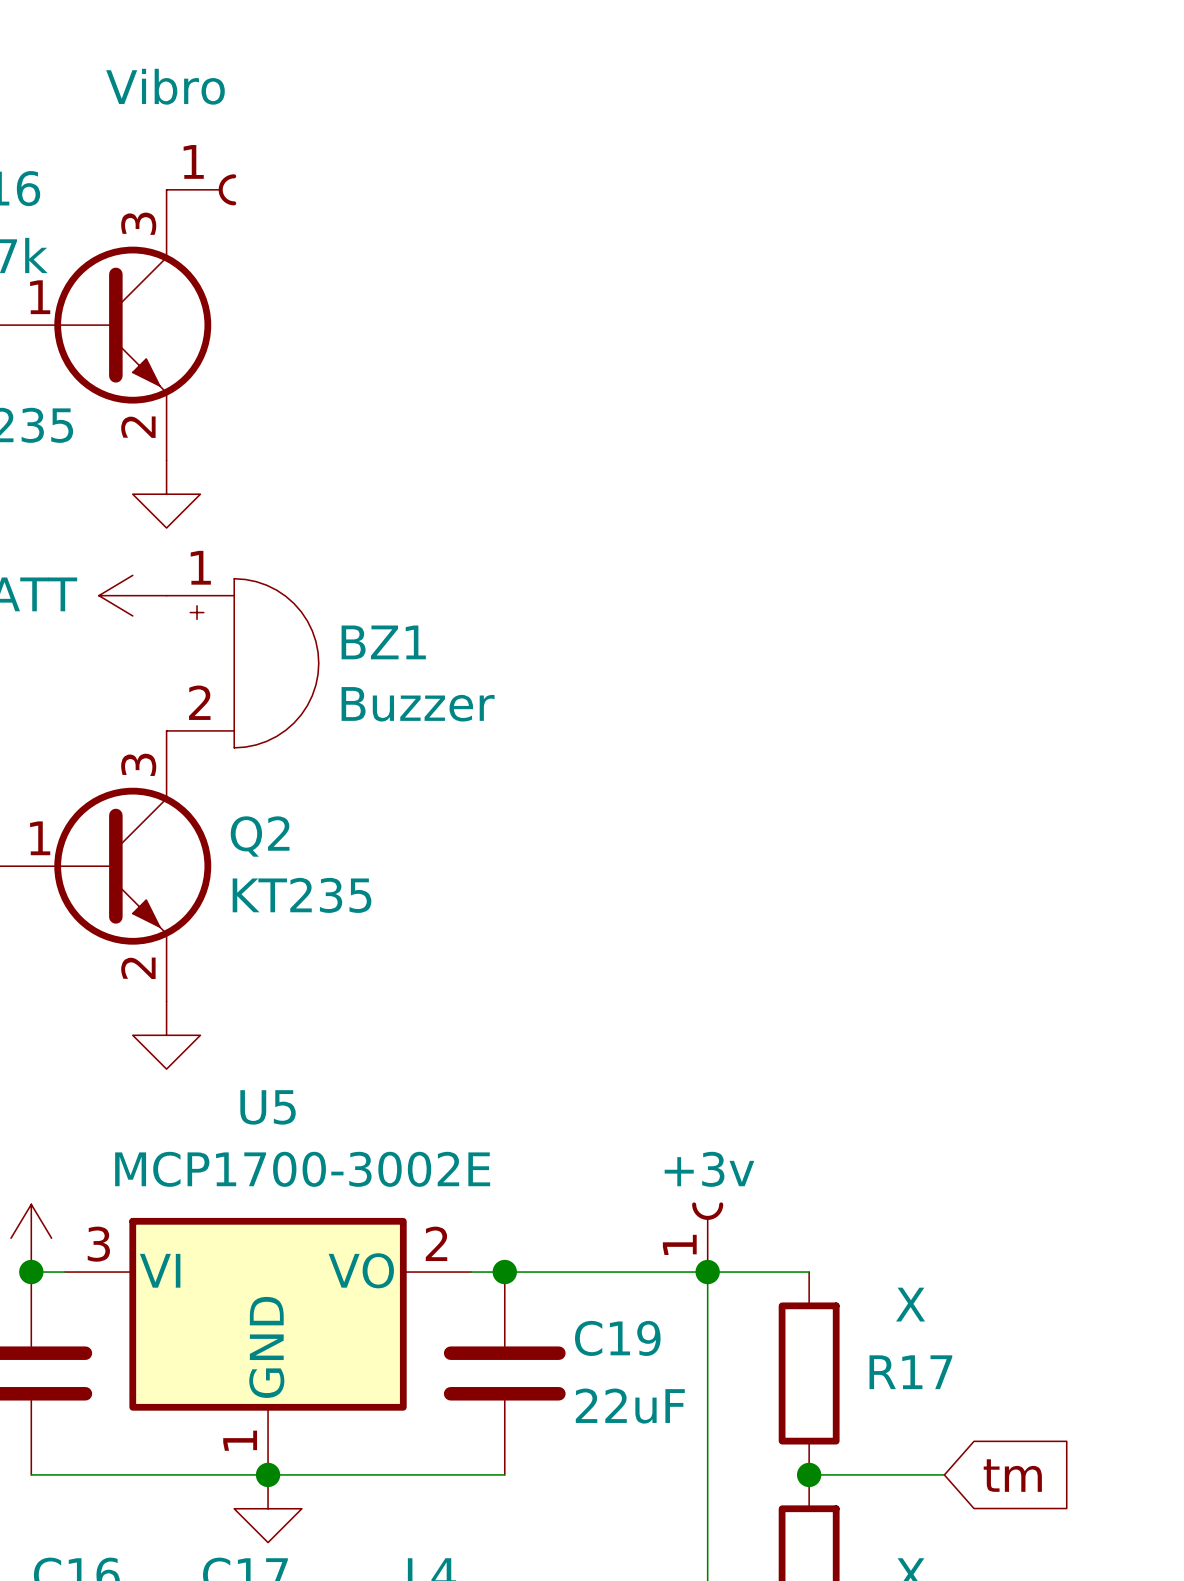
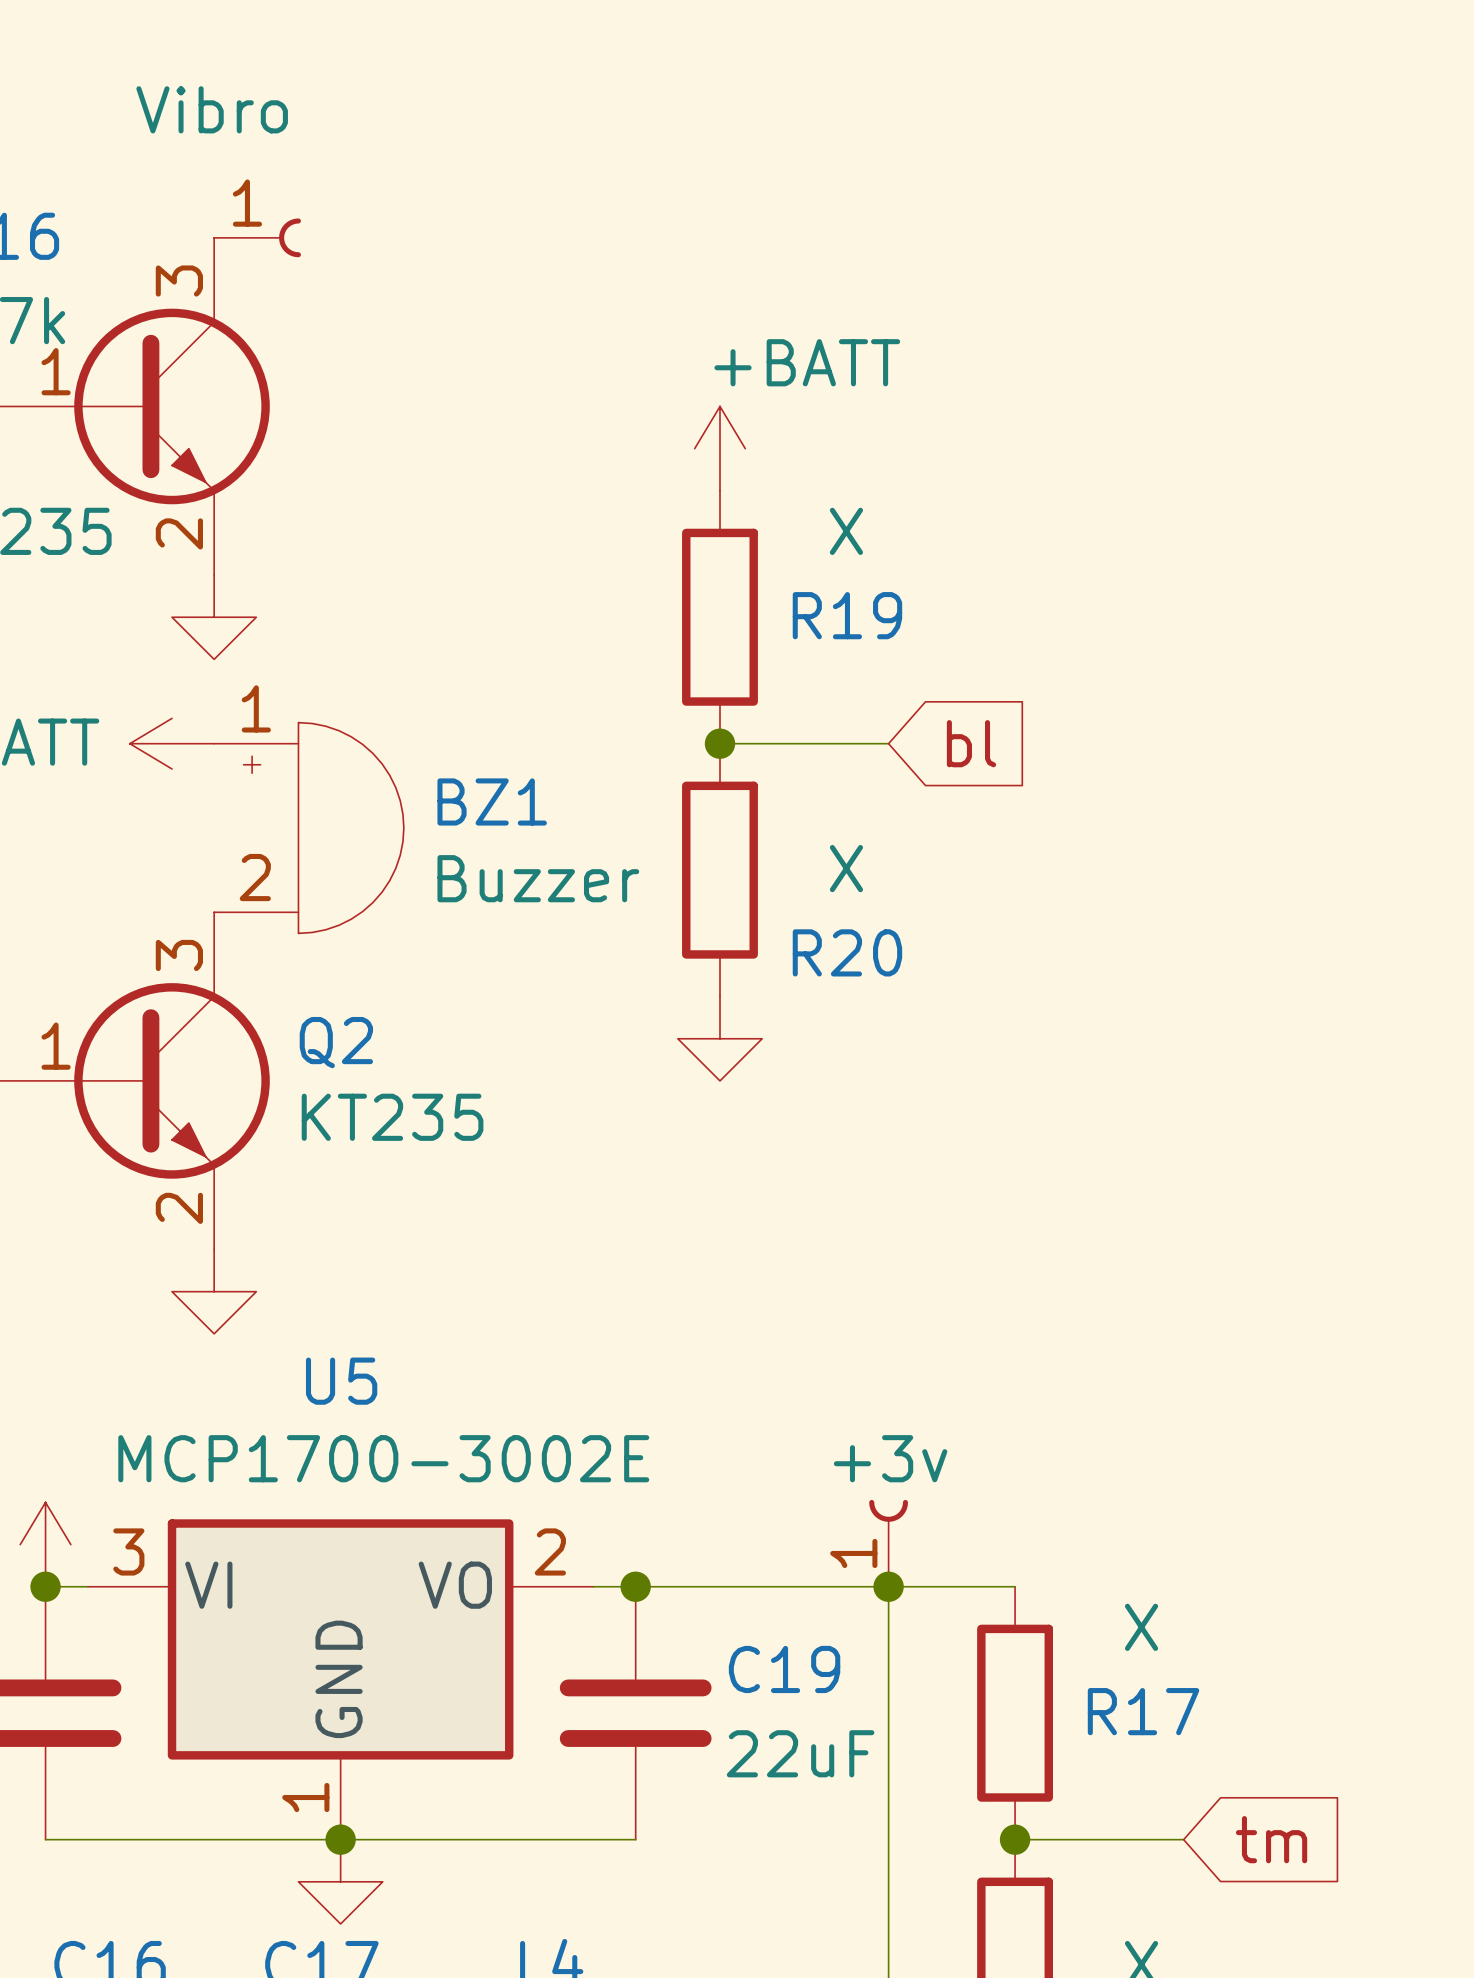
power symbol: none -> +BATT (719, 448)
R19: none -> X (719, 617)
wire: none -> (719, 743) (888, 743)
junction: none -> (719, 743)
global label: none -> bl (971, 743)
R20: none -> X (719, 870)
power symbol: none -> (719, 1038)

